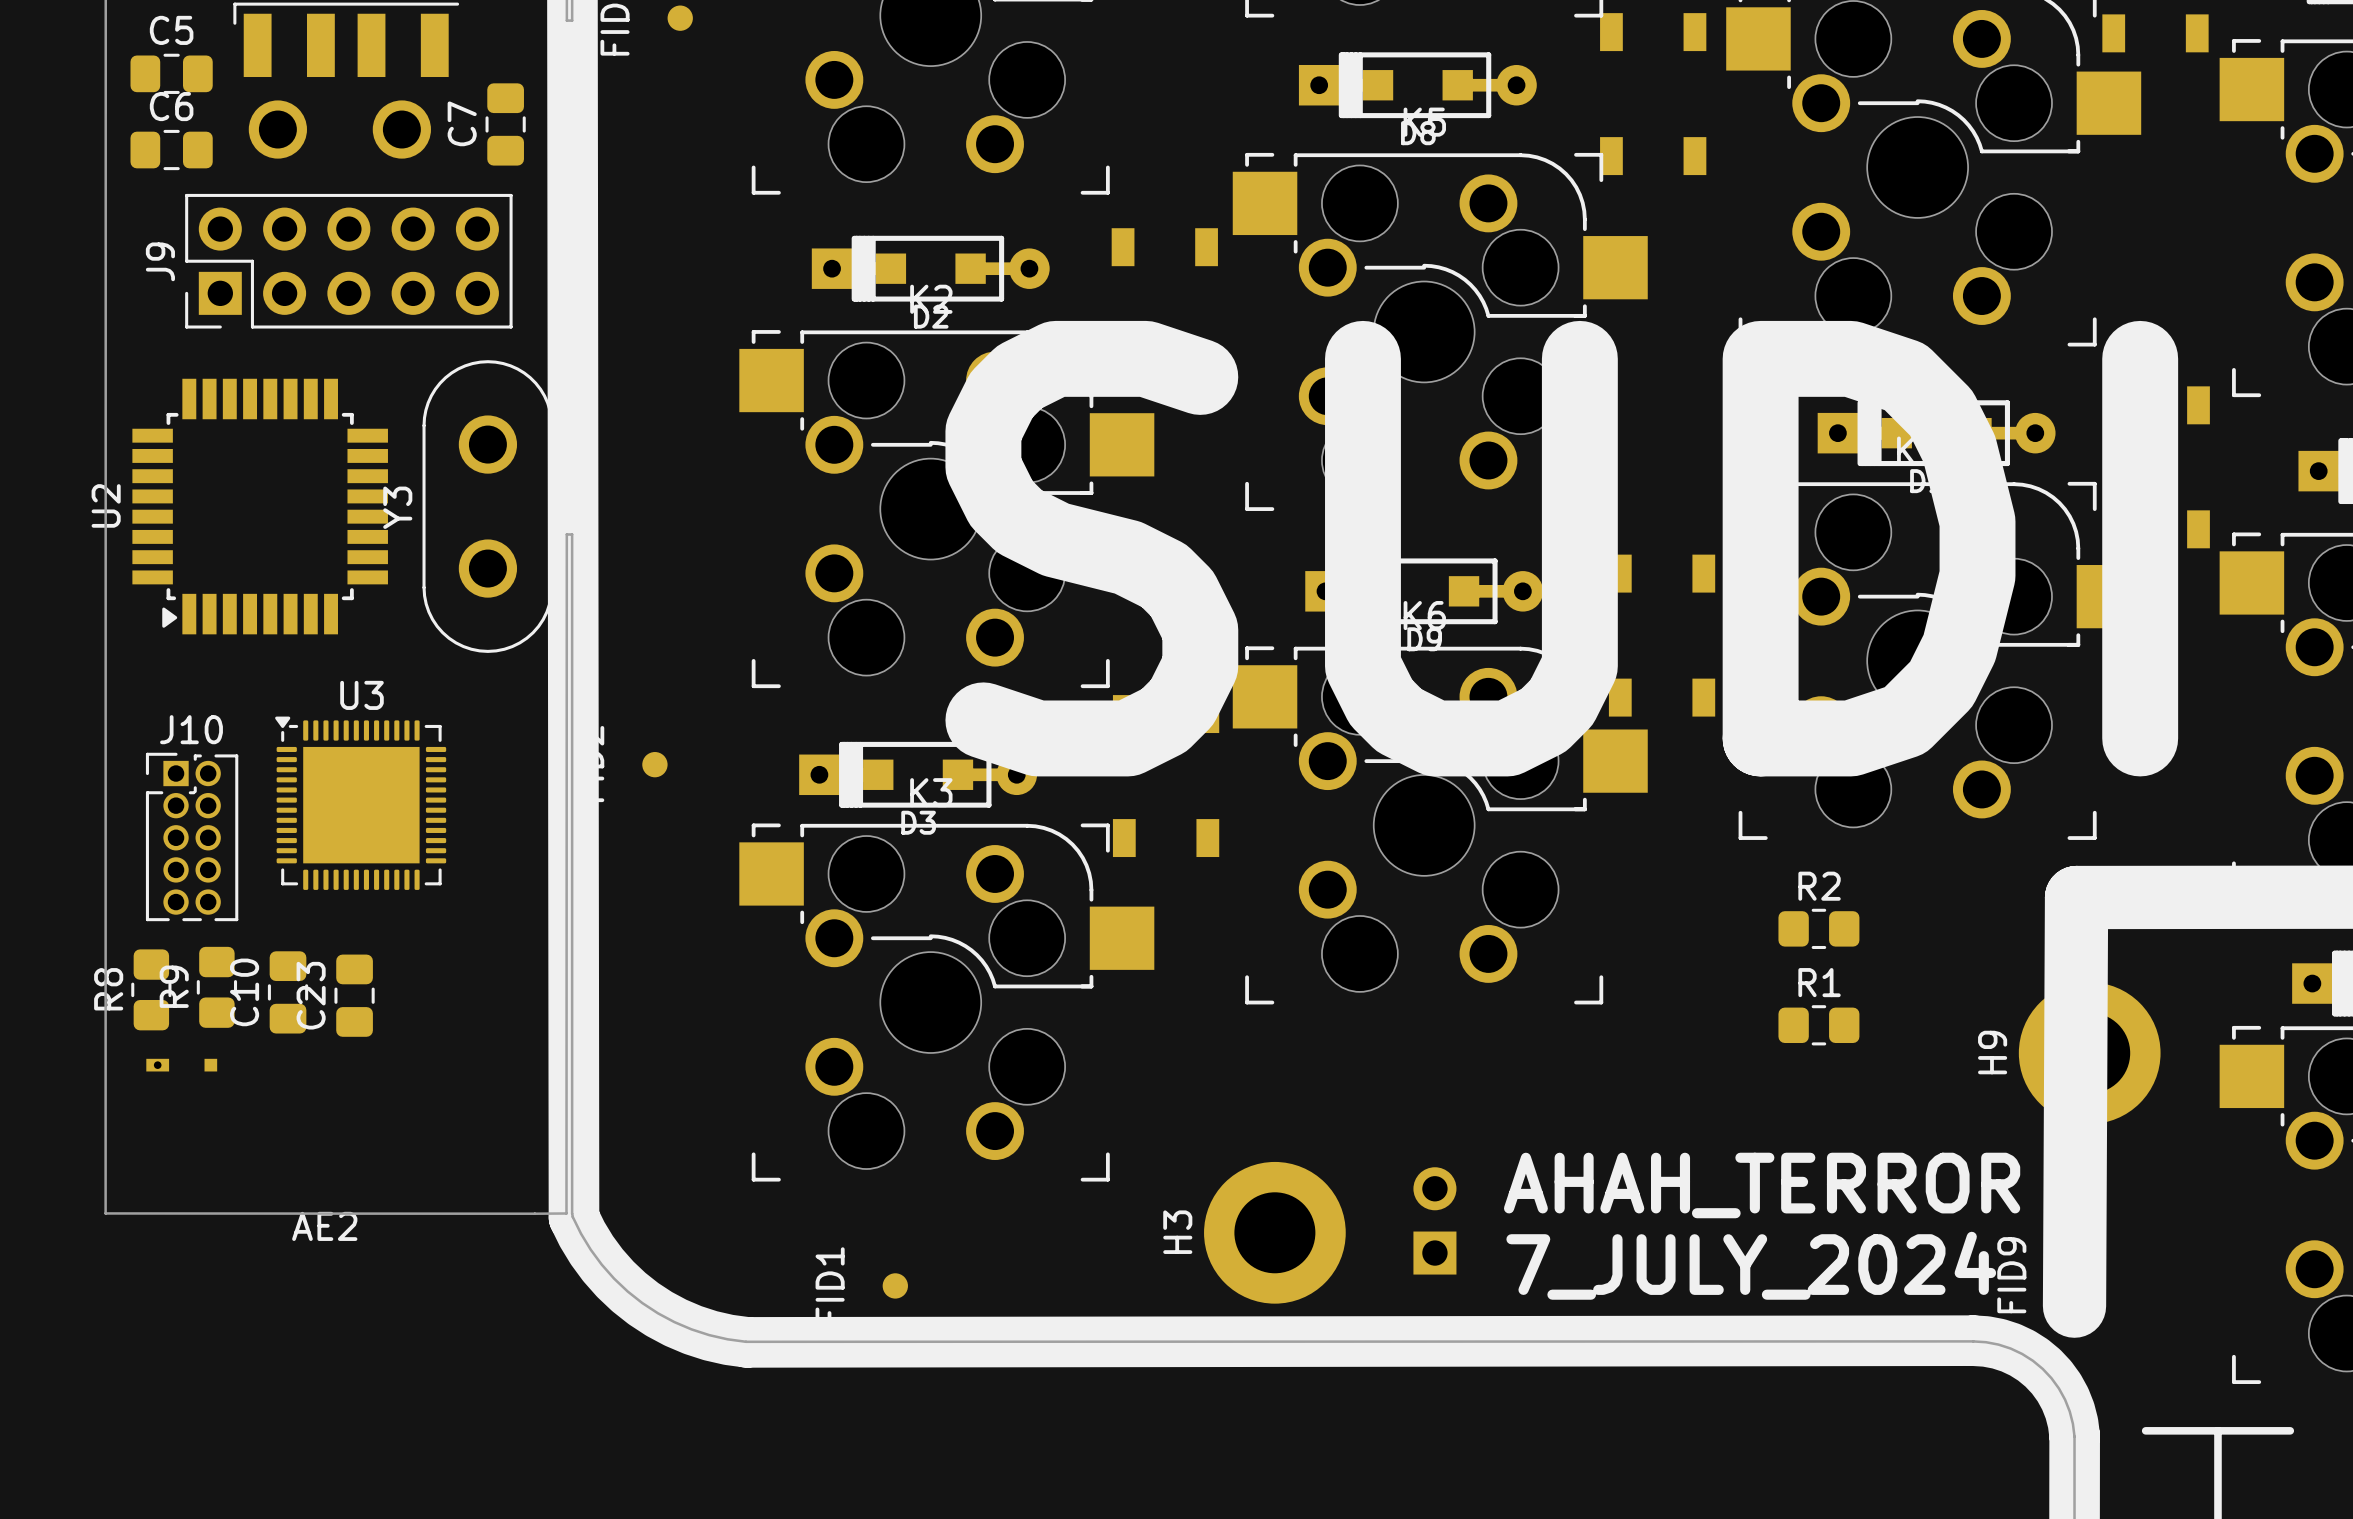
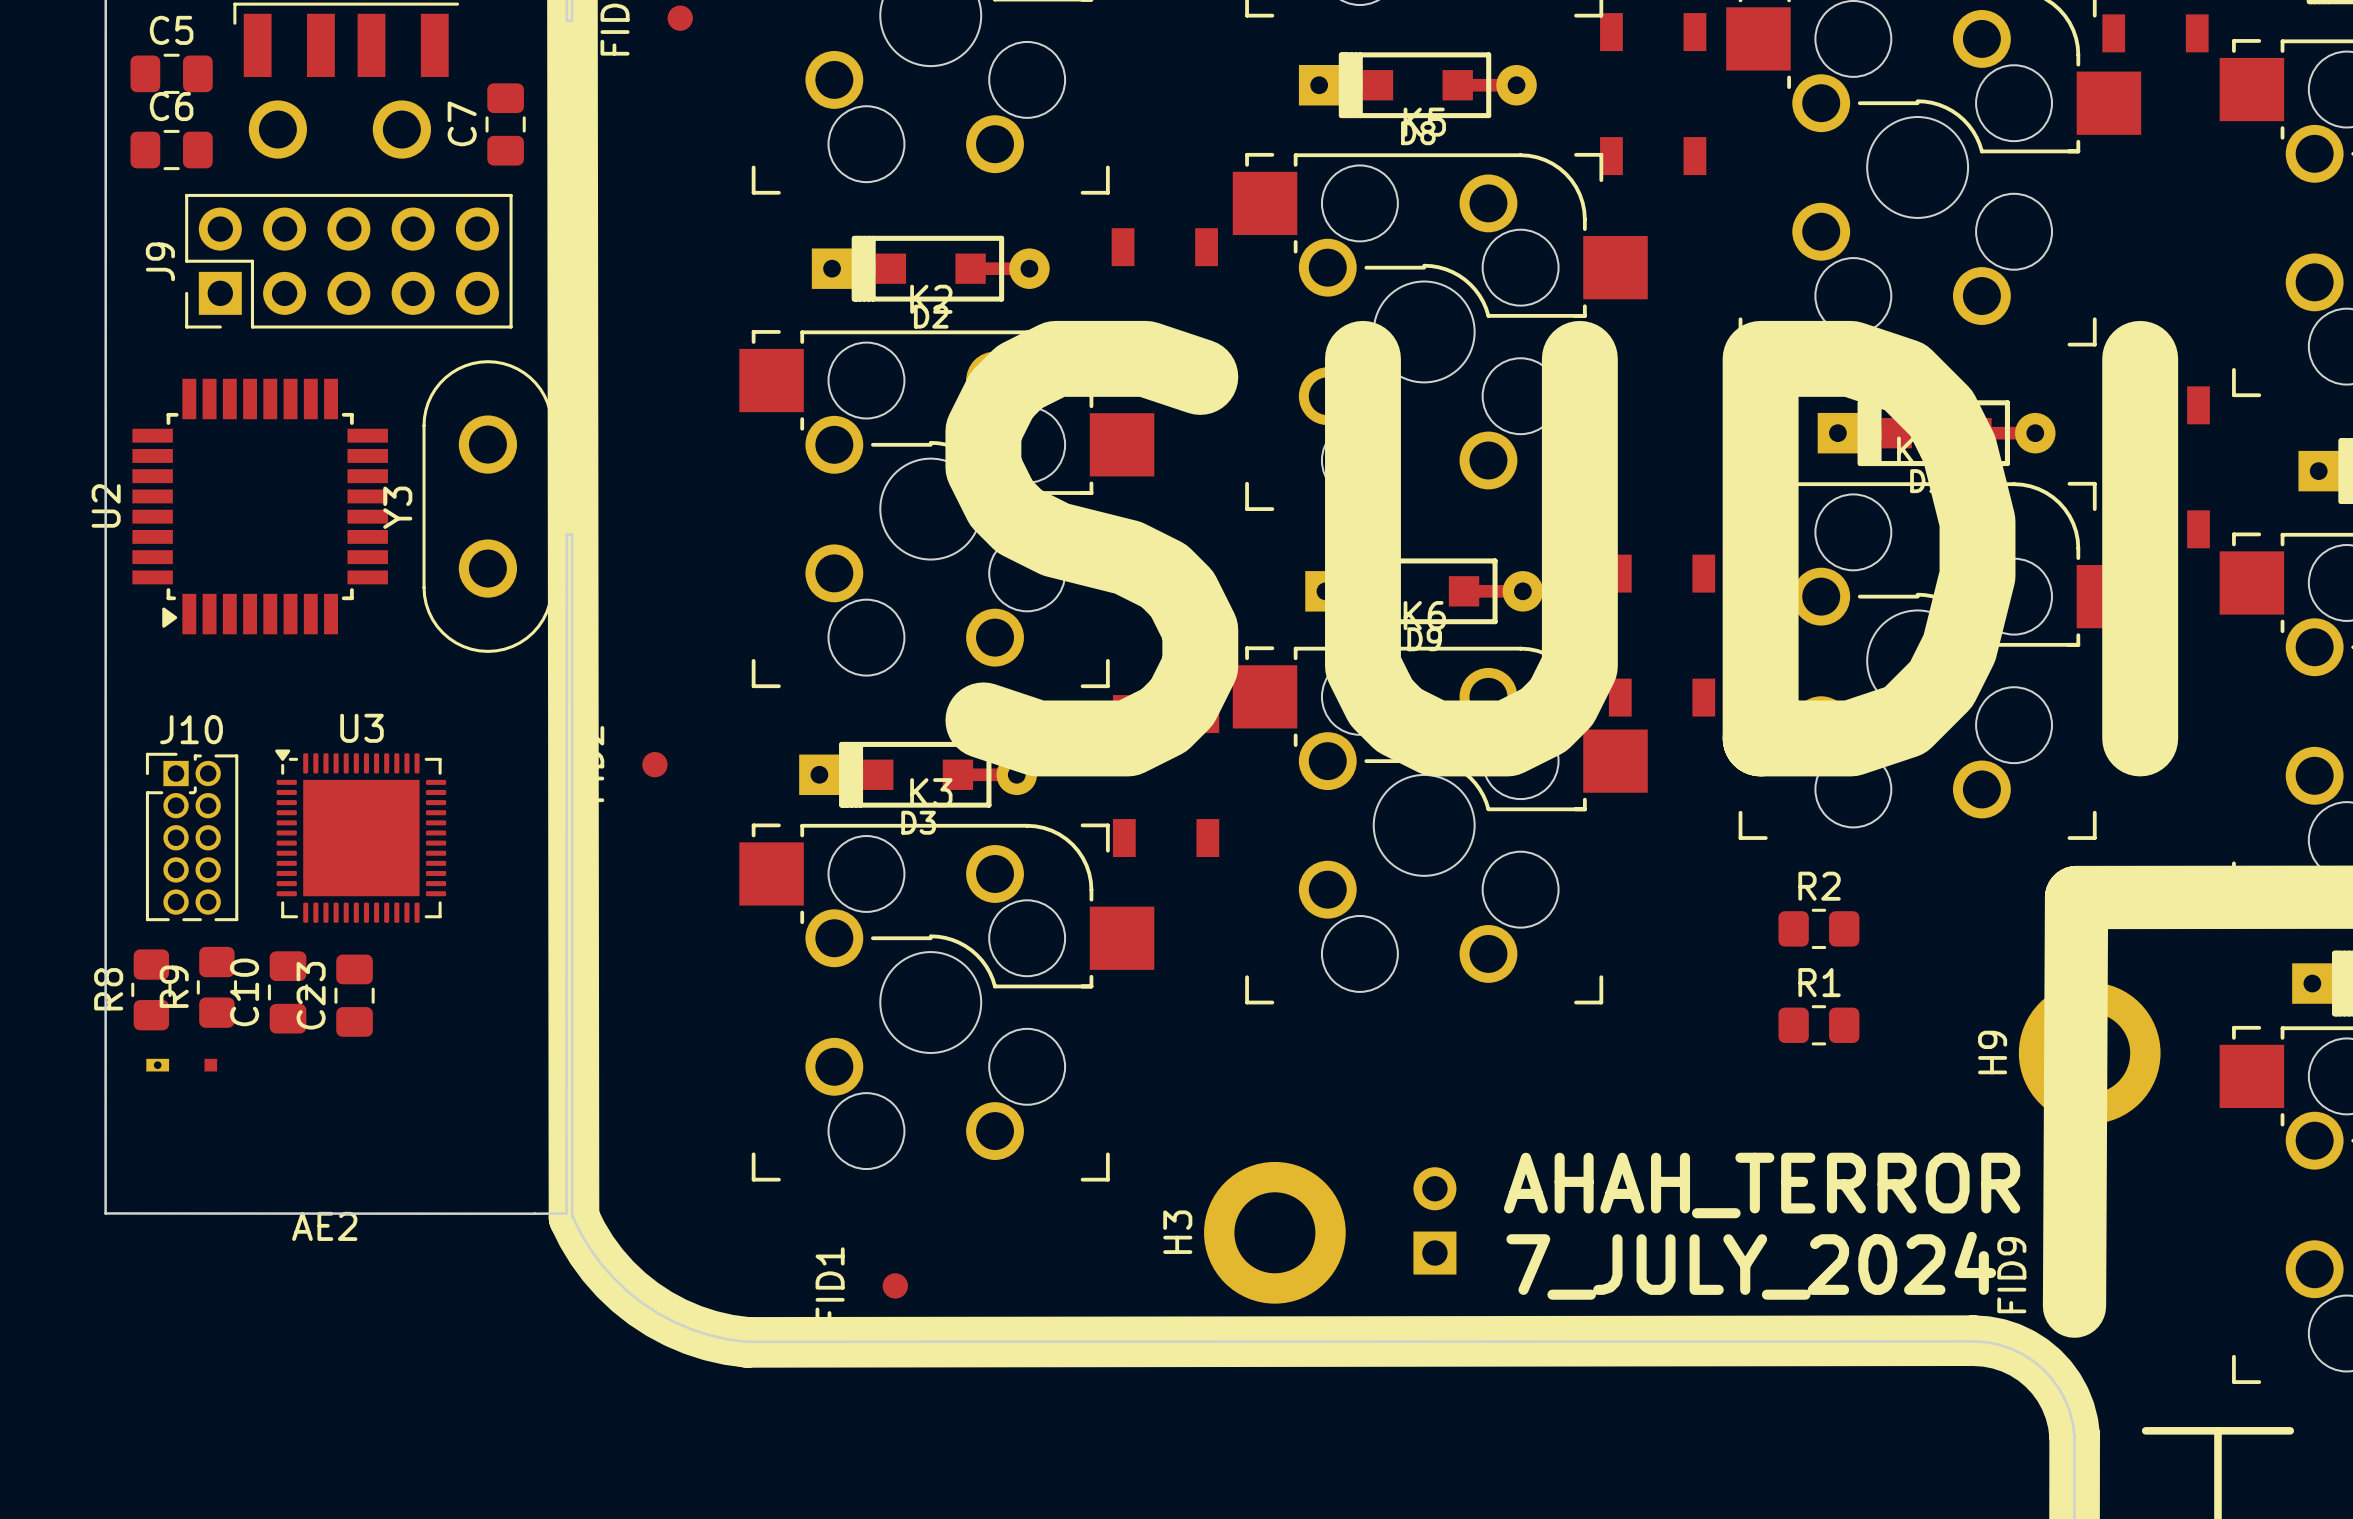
U3 position: (360, 803) -> (360, 836)

